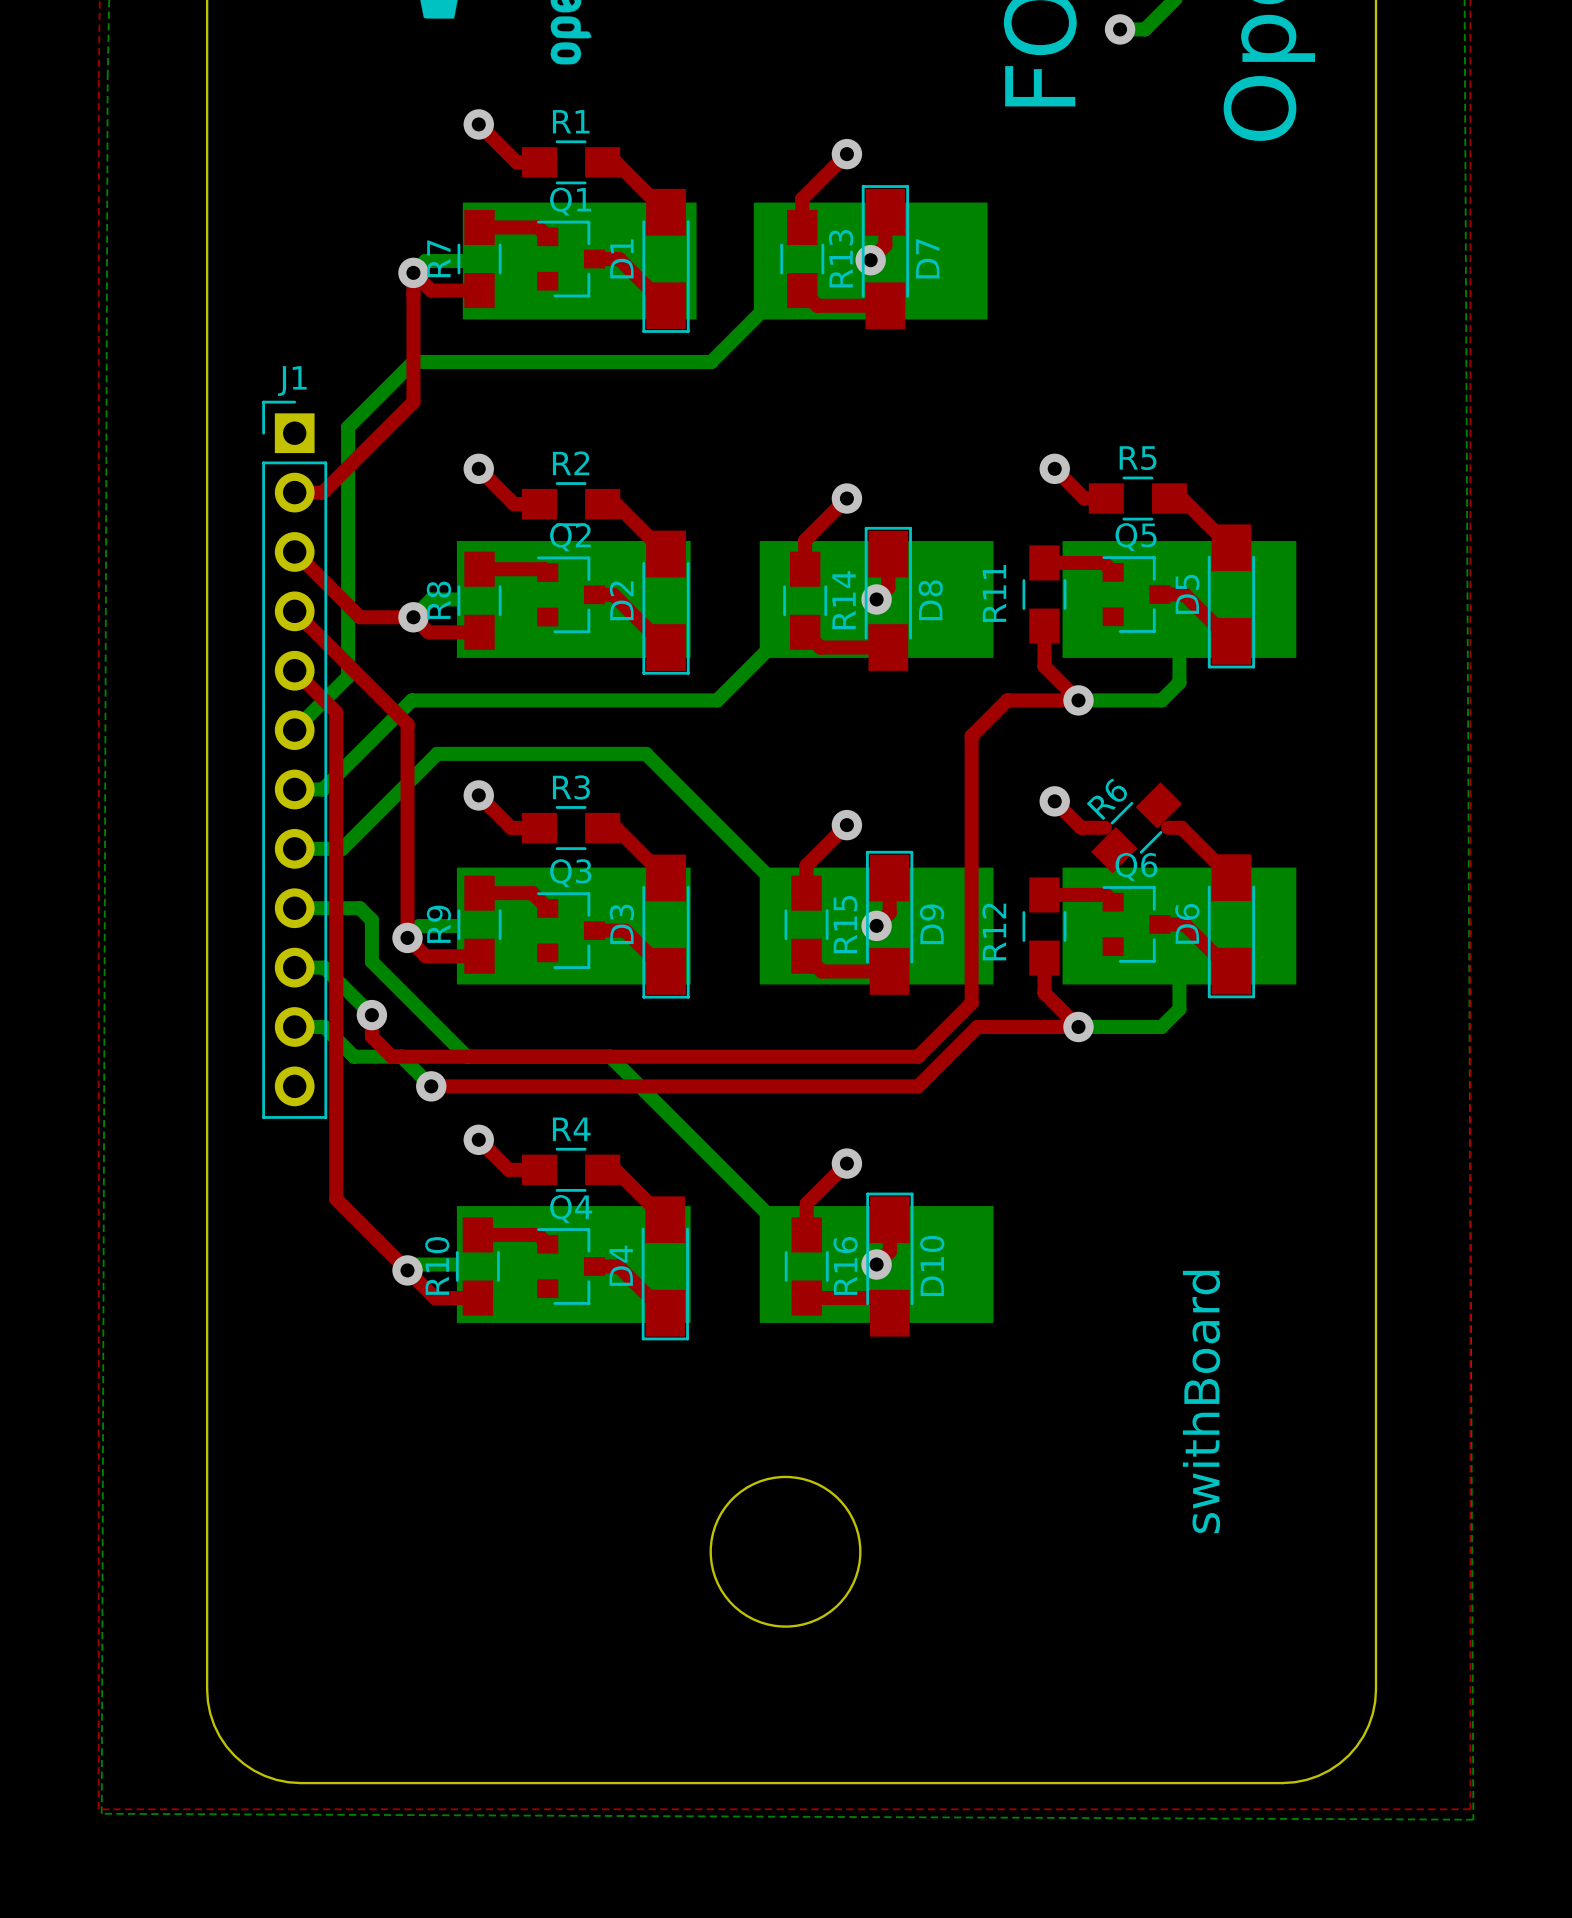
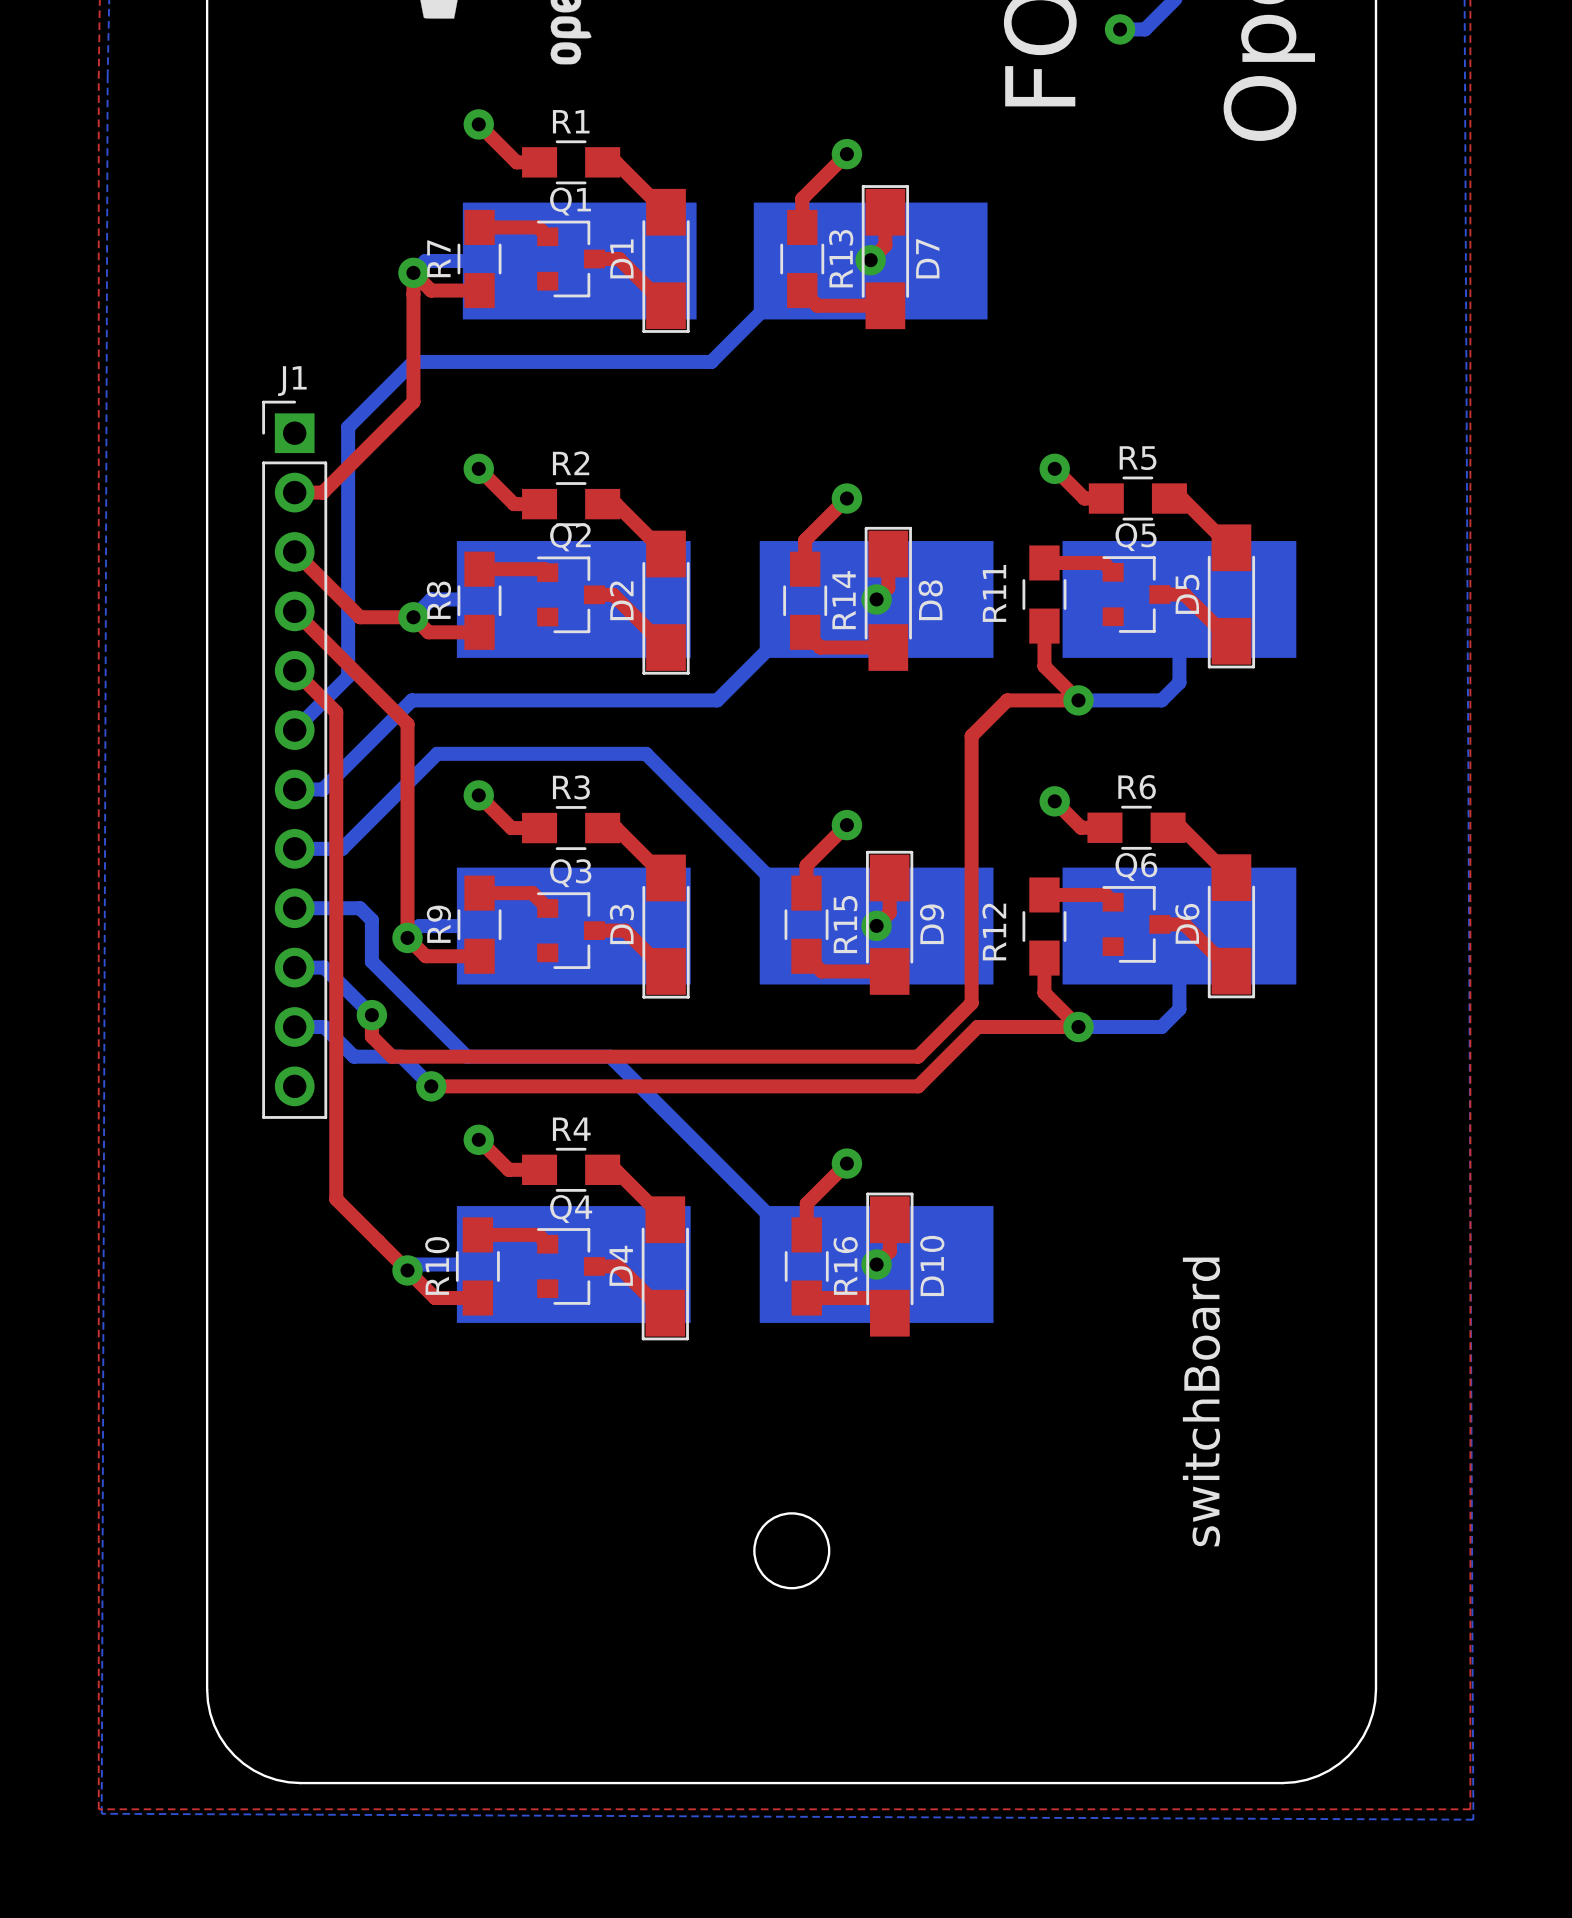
R6 rotation: 0° (1136, 827) -> 45° clockwise (1136, 827)
text: swithBoard (1201, 1401) -> switchBoard (1201, 1401)
round board edge size: [709, 1475, 862, 1628] -> [753, 1512, 831, 1590]

